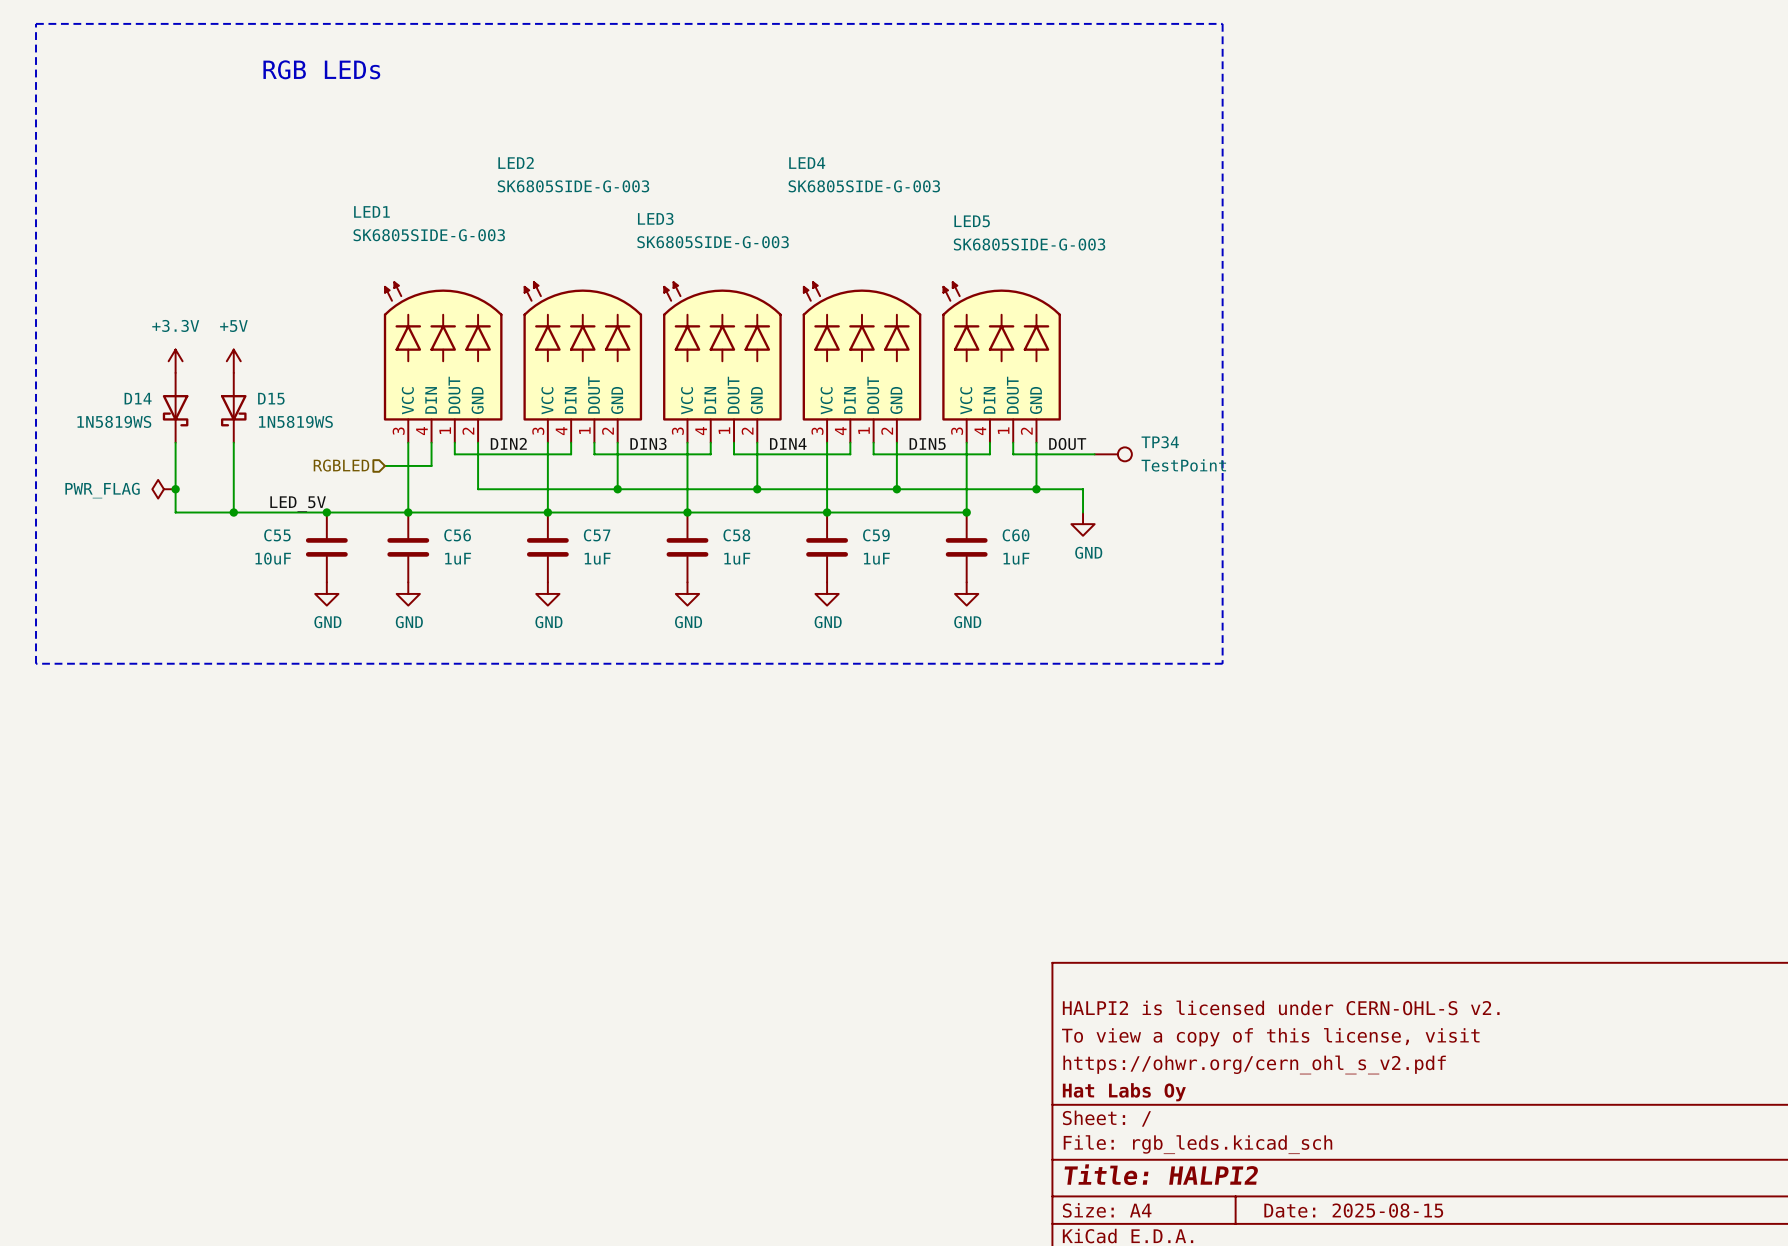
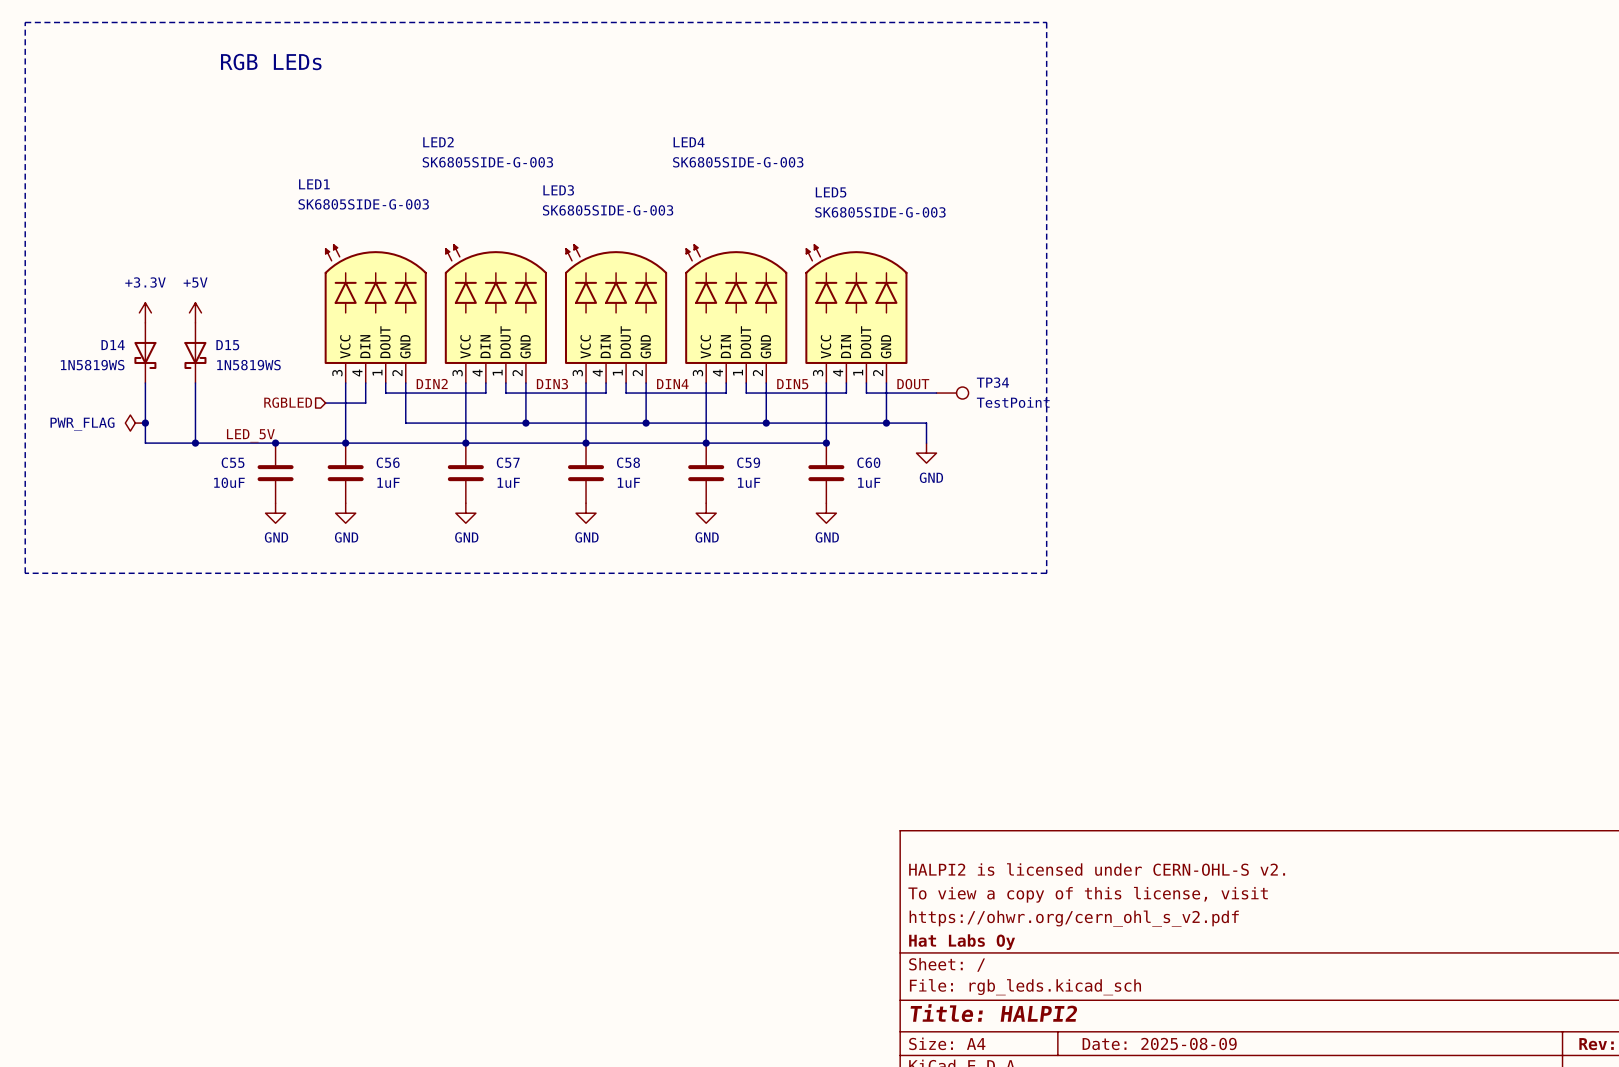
title block: Date: 2025-08-15 (1353, 1210) -> Date: 2025-08-09 (1159, 1043)

